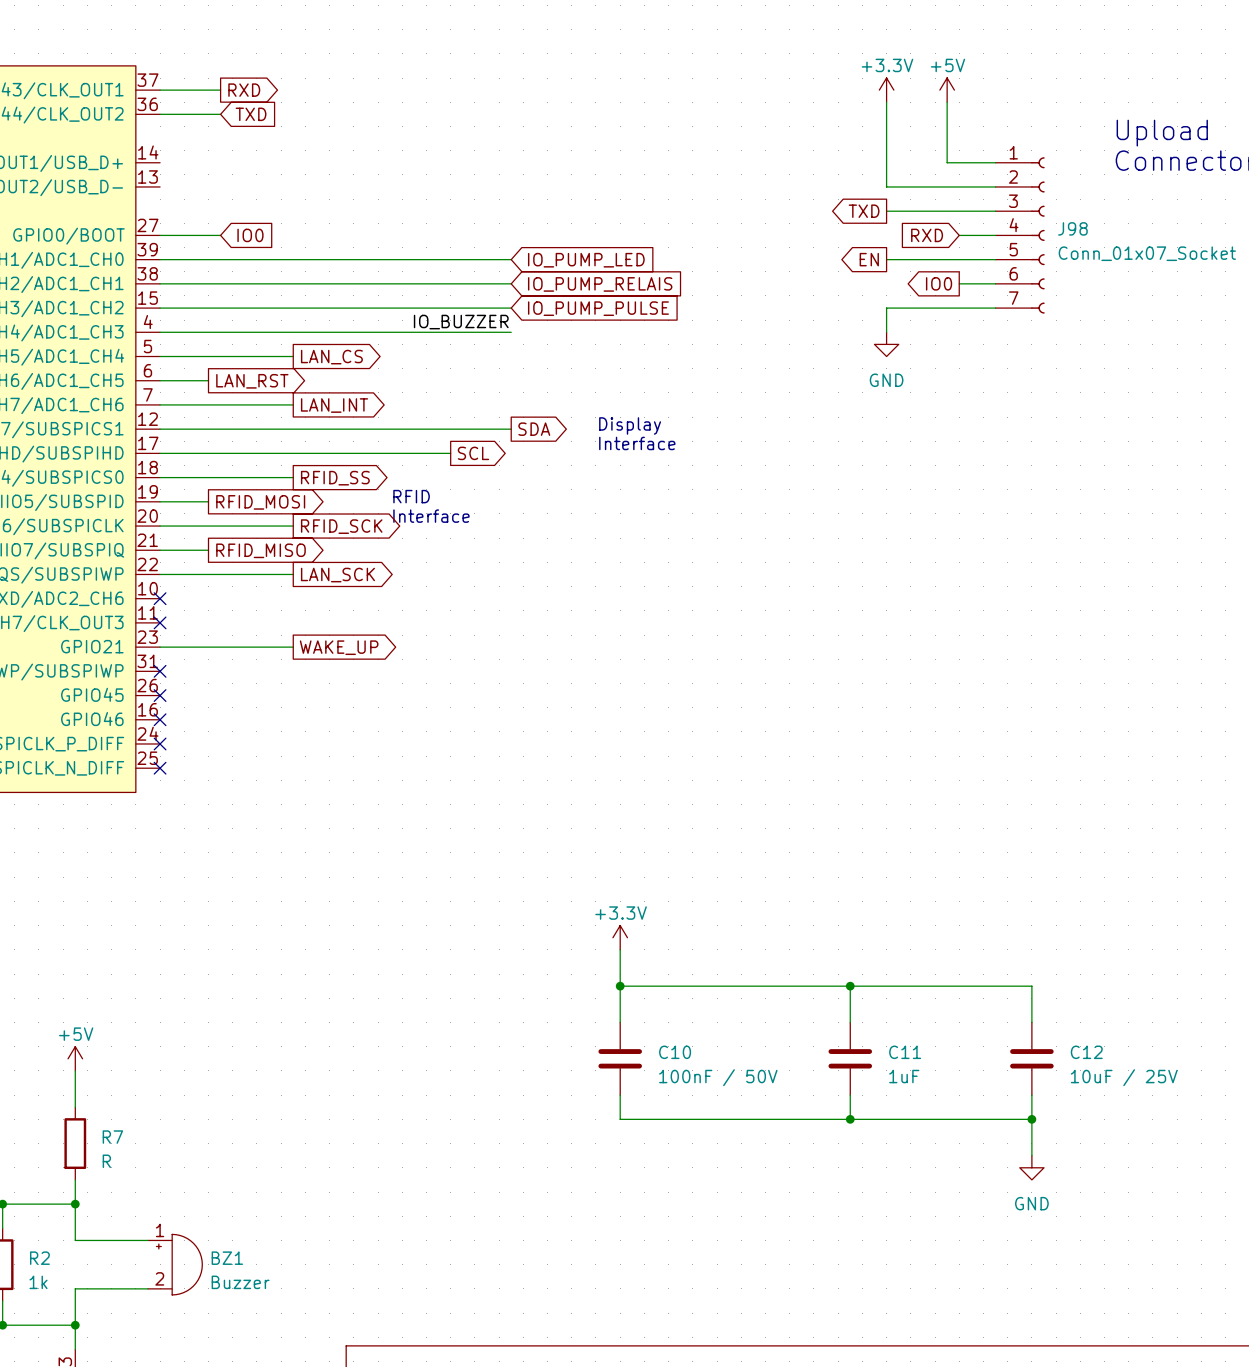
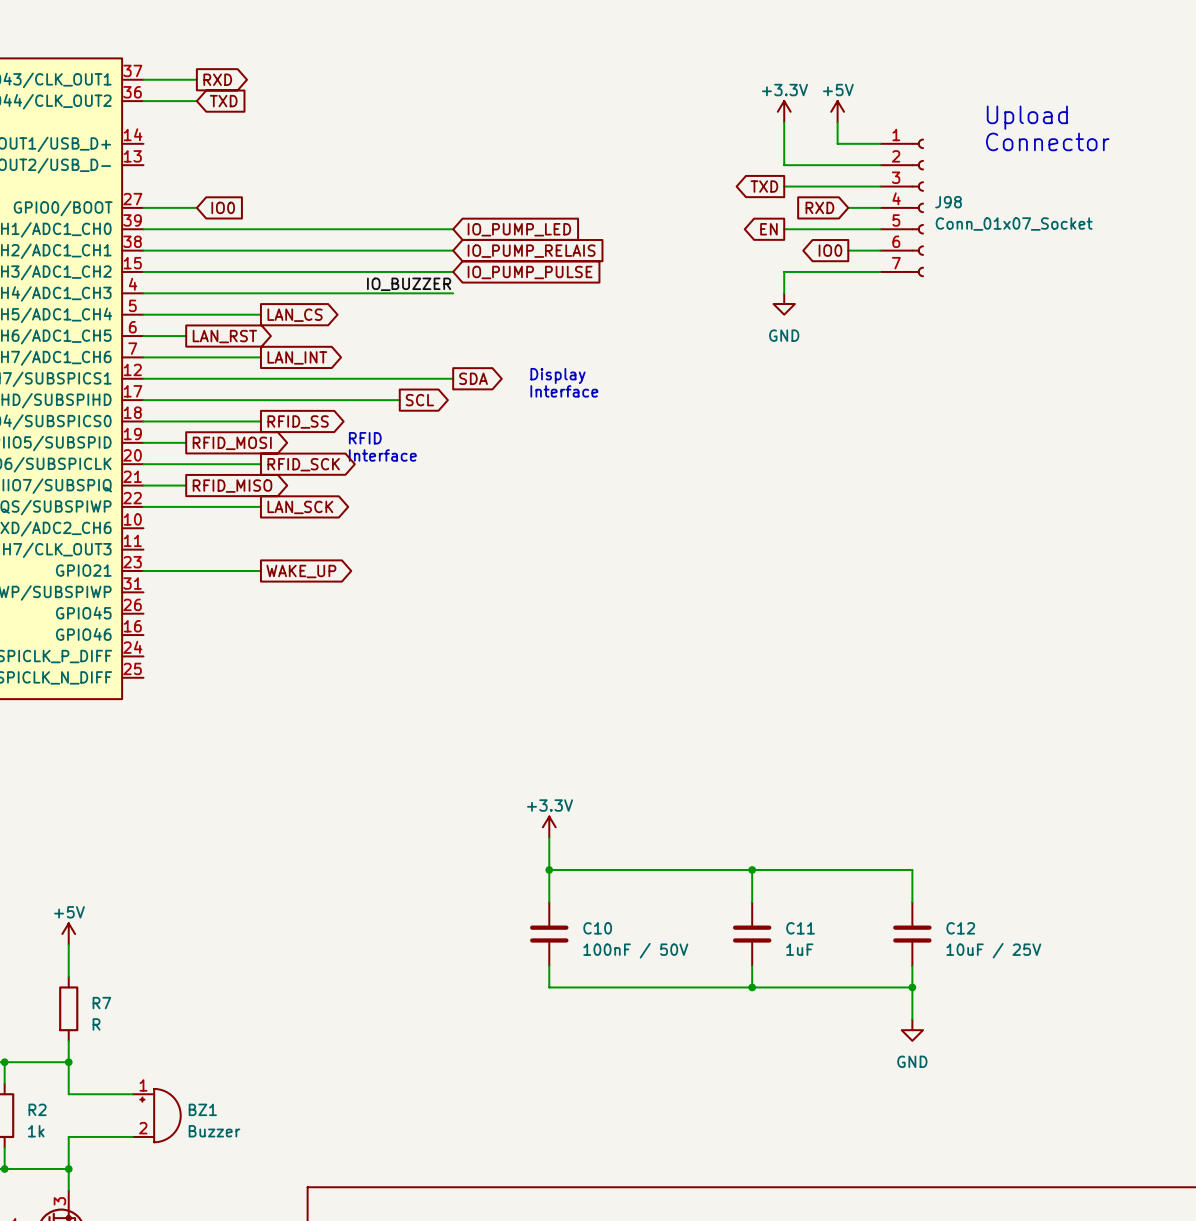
power symbol position: +3.3V (886, 90) -> +3.3V (784, 111)
power symbol position: +5V (947, 90) -> +5V (837, 111)
no-connect mark: (160, 598) -> none
no-connect mark: (160, 622) -> none
no-connect mark: (160, 671) -> none
no-connect mark: (160, 695) -> none
no-connect mark: (160, 719) -> none
no-connect mark: (160, 743) -> none
no-connect mark: (160, 768) -> none

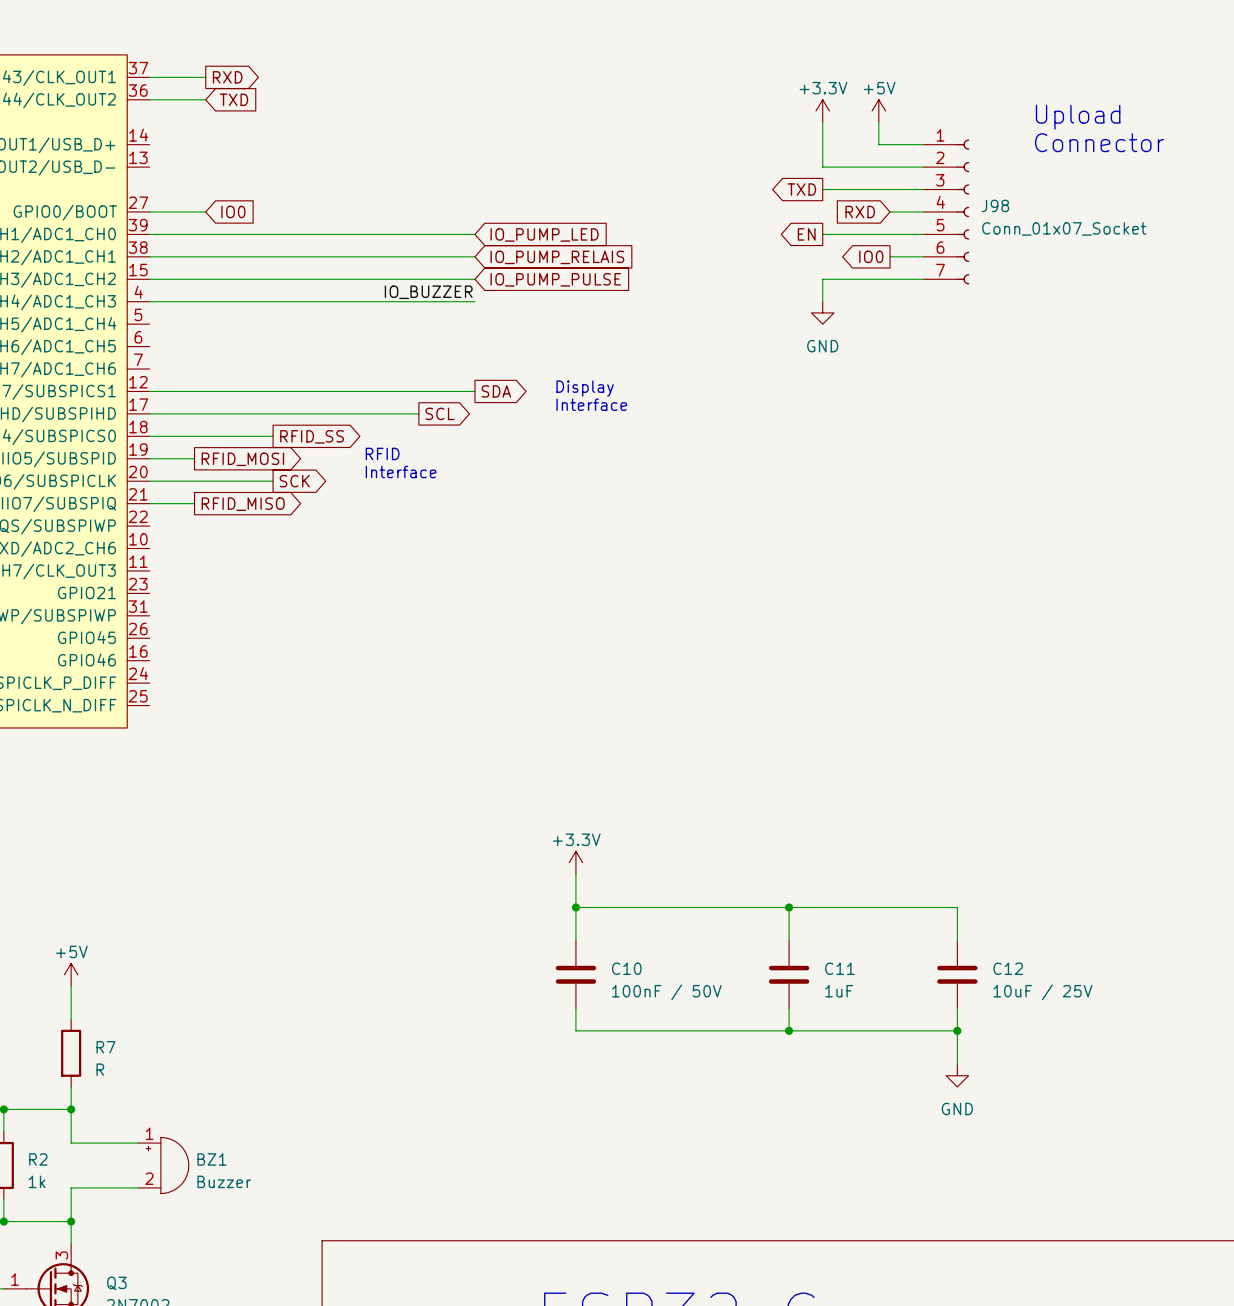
wire: (143, 314) (260, 314) -> none
global label: LAN_CS (295, 315) -> none
wire: (143, 336) (186, 336) -> none
global label: LAN_RST (224, 336) -> none
wire: (143, 357) (260, 357) -> none
global label: LAN_INT (297, 357) -> none
global label: RFID_SCK (303, 464) -> SCK (294, 481)
wire: (143, 506) (260, 506) -> none
global label: LAN_SCK (300, 507) -> none
wire: (143, 570) (260, 570) -> none
global label: WAKE_UP (301, 571) -> none

